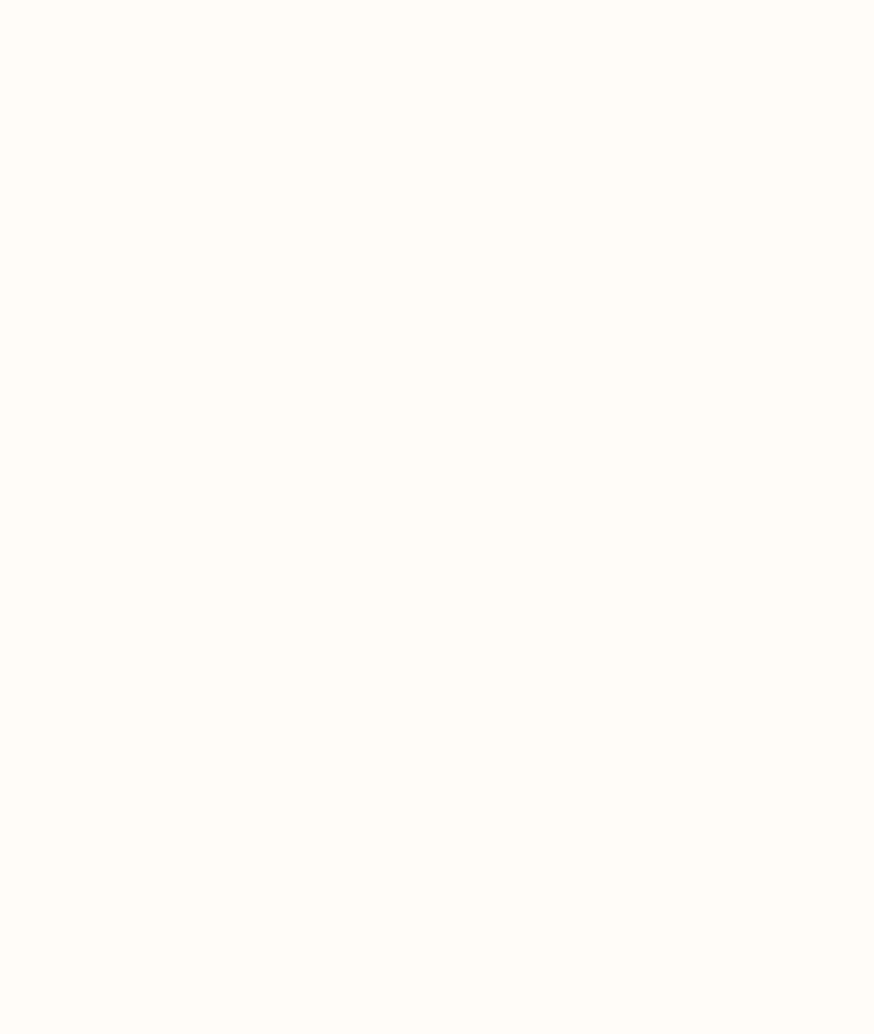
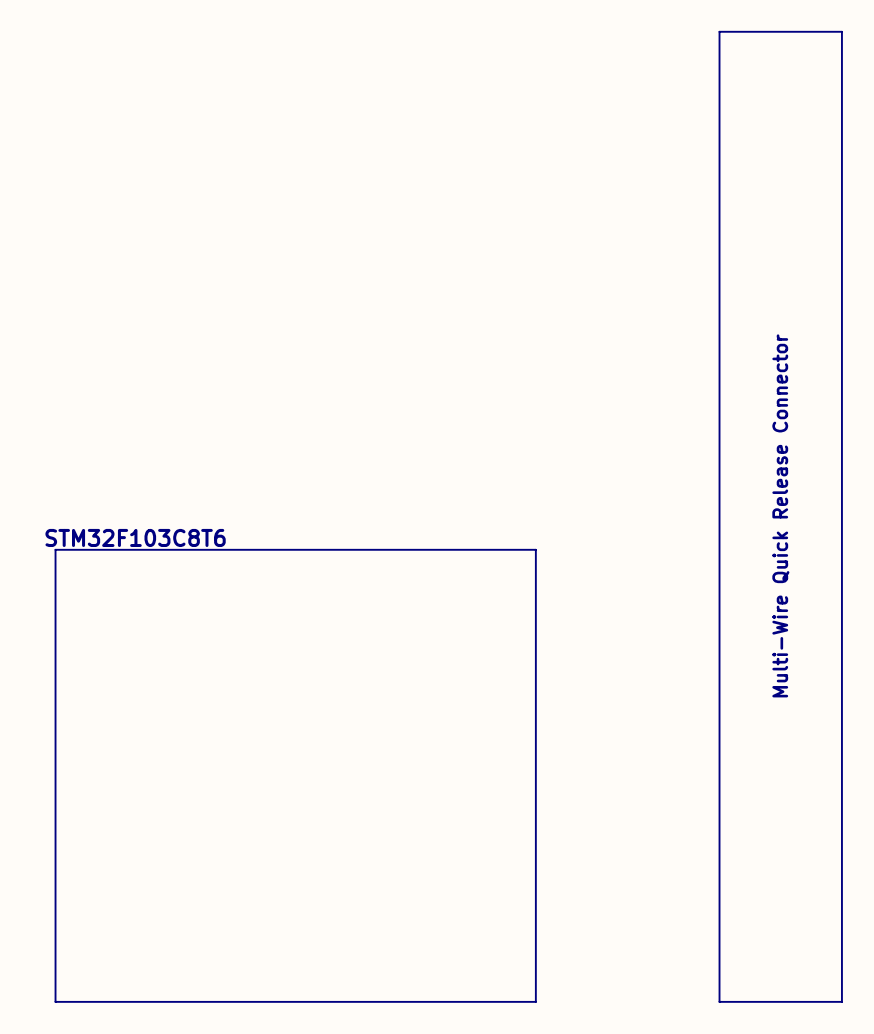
line: none -> (719, 31) (841, 31) (841, 1001) (719, 1001) (719, 31)
text: none -> Multi-Wire Quick Release Connector (780, 515)
text: none -> STM32F103C8T6 (135, 537)
line: none -> (55, 549) (535, 549) (535, 1001) (55, 1001) (55, 549)

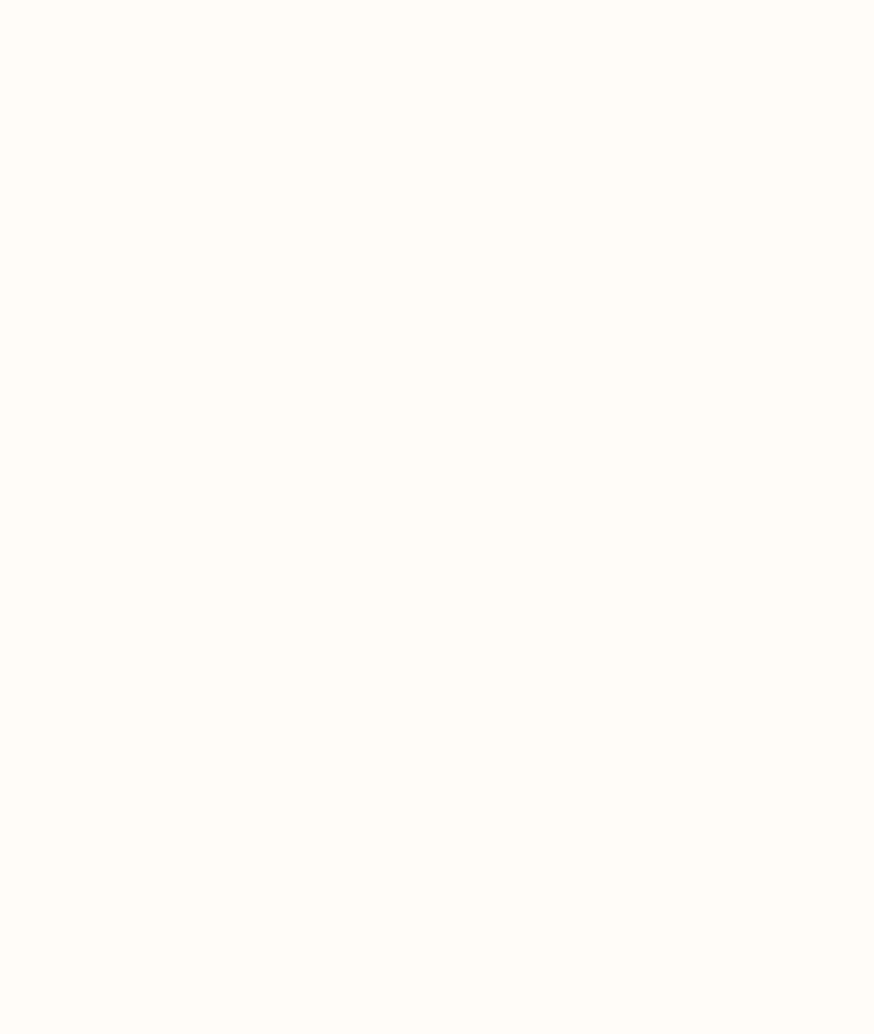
line: (719, 31) (841, 31) (841, 1001) (719, 1001) (719, 31) -> none
text: Multi-Wire Quick Release Connector (780, 515) -> none
text: STM32F103C8T6 (135, 537) -> none
line: (55, 549) (535, 549) (535, 1001) (55, 1001) (55, 549) -> none

